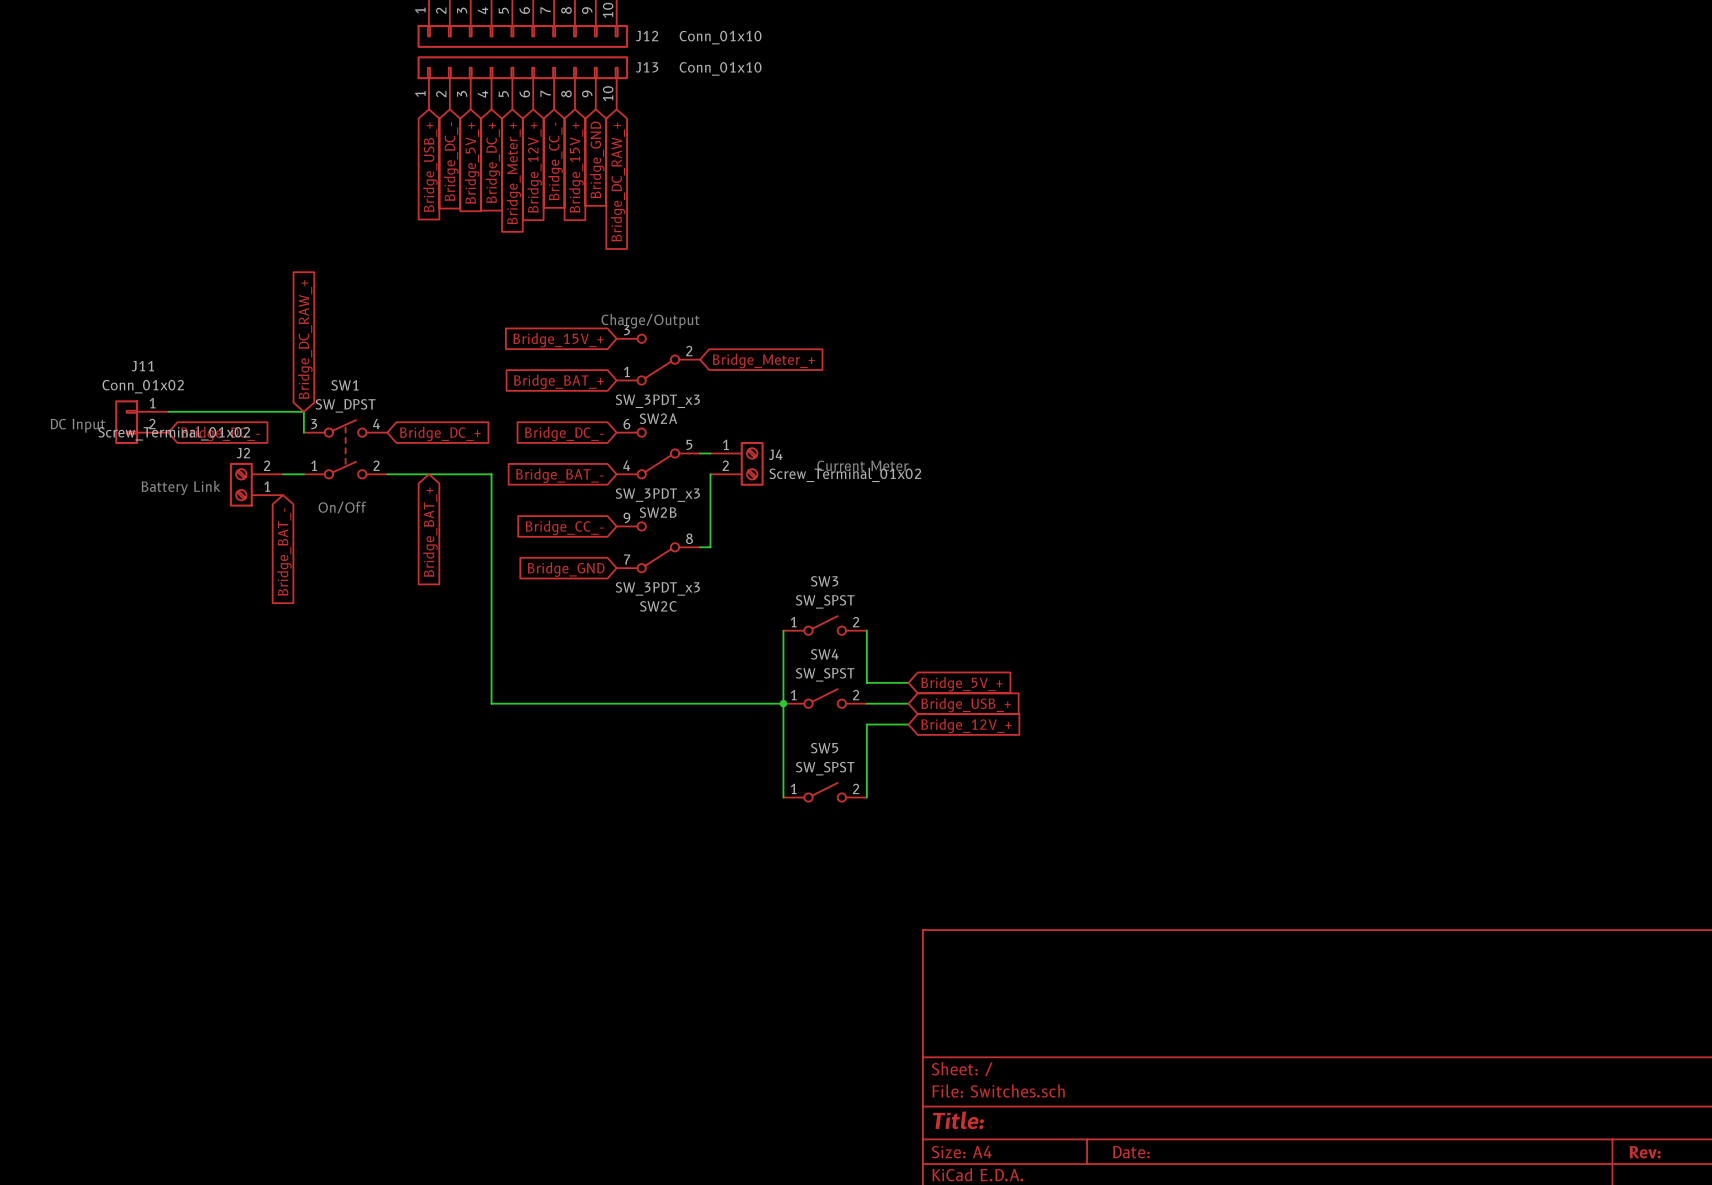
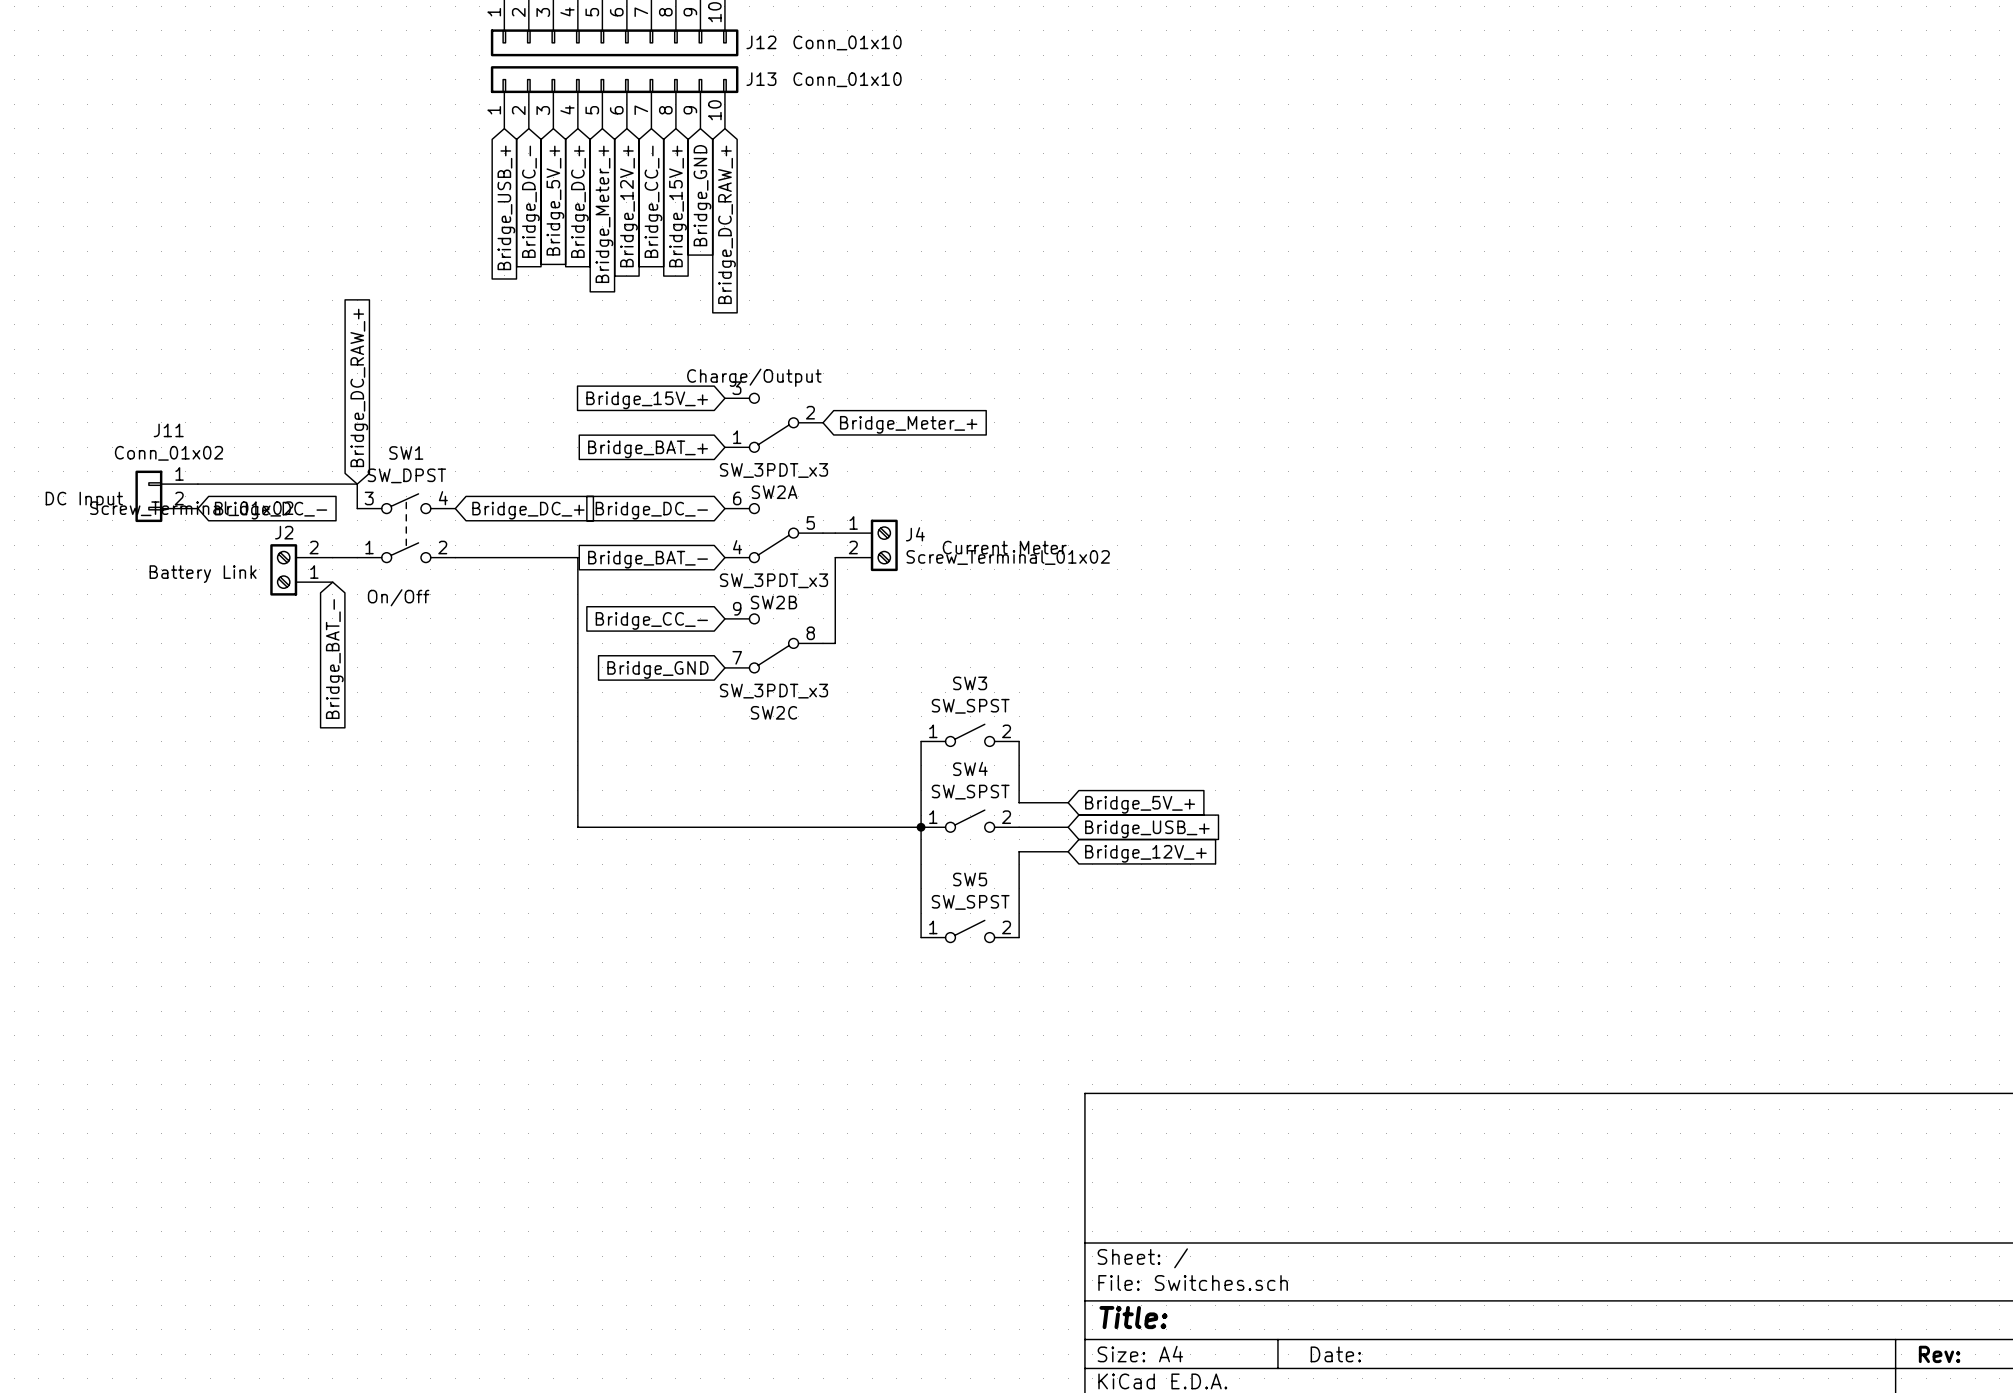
global label: Bridge_BAT_+ (430, 532) -> none

